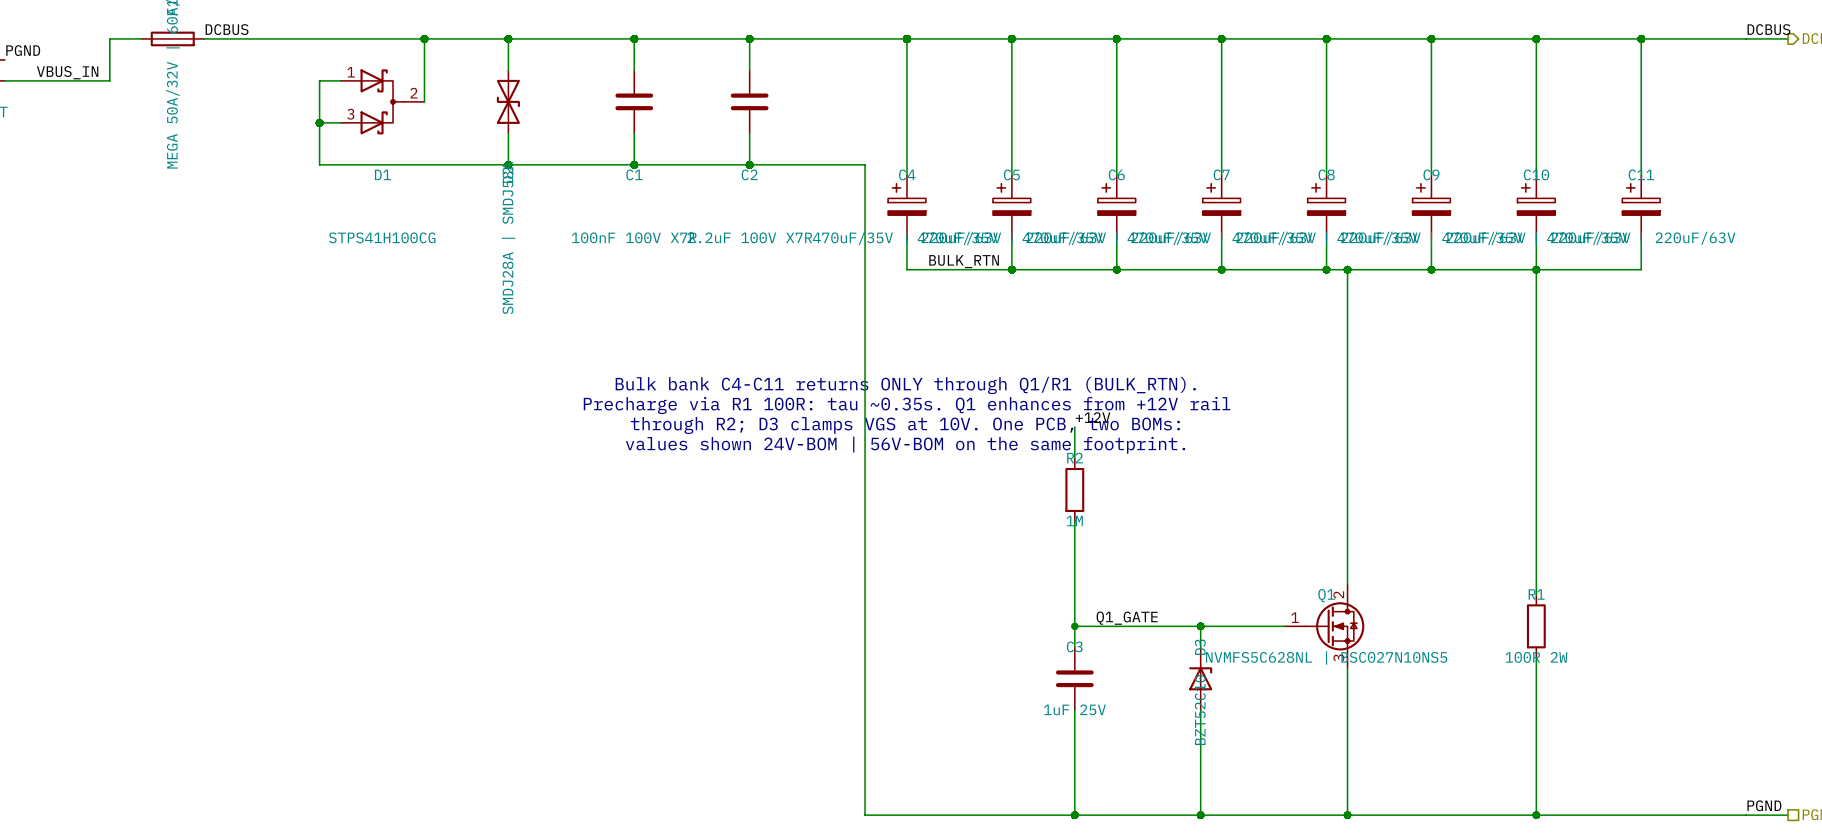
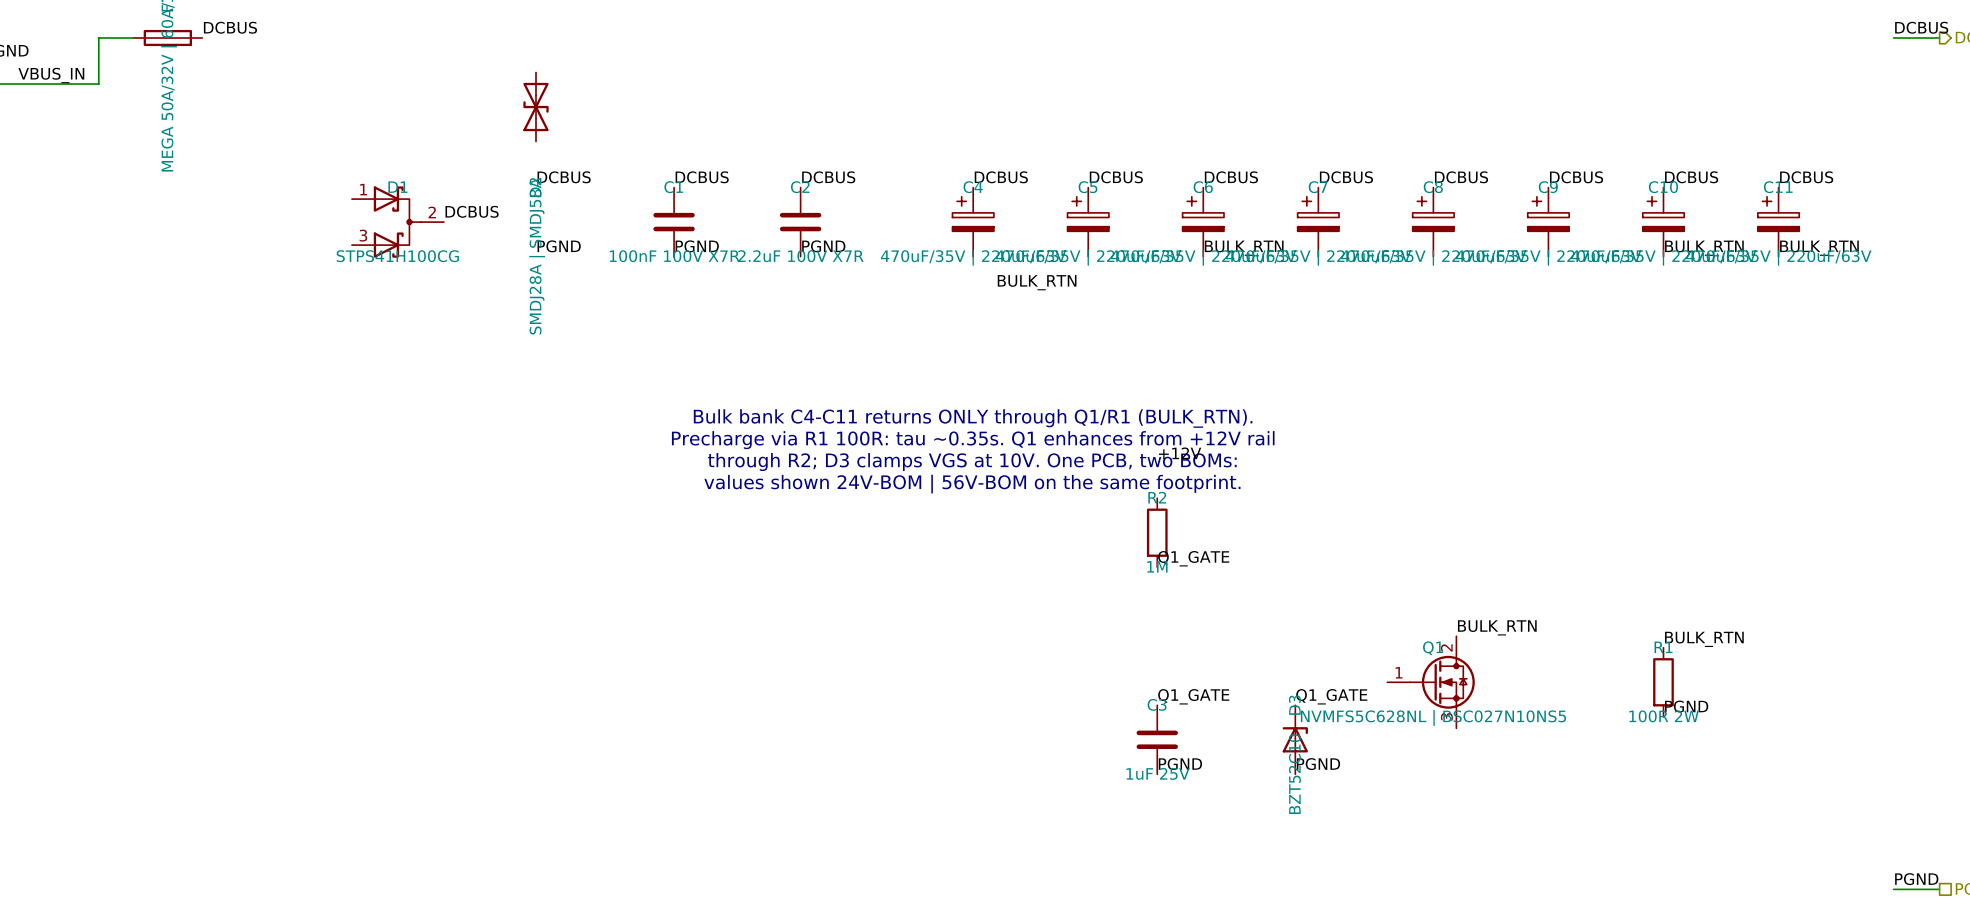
wire: (204, 38) (1746, 38) -> none
wire: (424, 38) (424, 101) -> none
junction: (424, 38) -> none
wire: (508, 38) (508, 70) -> none
junction: (508, 38) -> none
wire: (634, 38) (634, 70) -> none
junction: (634, 38) -> none
wire: (749, 38) (749, 70) -> none
junction: (749, 38) -> none
wire: (906, 38) (906, 175) -> none
junction: (906, 38) -> none
wire: (1011, 38) (1011, 175) -> none
junction: (1011, 38) -> none
wire: (1116, 38) (1116, 175) -> none
junction: (1116, 38) -> none
wire: (1221, 38) (1221, 175) -> none
junction: (1221, 38) -> none
wire: (1326, 38) (1326, 175) -> none
junction: (1326, 38) -> none
wire: (1431, 38) (1431, 175) -> none
junction: (1431, 38) -> none
wire: (1536, 38) (1536, 175) -> none
junction: (1536, 38) -> none
wire: (1641, 38) (1641, 175) -> none
junction: (1641, 38) -> none
wire: (340, 80) (319, 80) (319, 164) (865, 164) (865, 815) (1746, 815) -> none
D1 position: (382, 101) -> (397, 222)
C1 position: (634, 101) -> (674, 222)
C2 position: (749, 101) -> (800, 222)
wire: (319, 122) (340, 122) -> none
junction: (319, 122) -> none
wire: (508, 133) (508, 164) -> none
wire: (634, 133) (634, 164) -> none
wire: (749, 133) (749, 164) -> none
junction: (508, 164) -> none
junction: (634, 164) -> none
junction: (749, 164) -> none
label: none -> DCBUS (564, 177)
label: none -> DCBUS (702, 177)
label: none -> DCBUS (828, 177)
label: none -> DCBUS (1001, 177)
label: none -> DCBUS (1116, 177)
label: none -> DCBUS (1231, 177)
label: none -> DCBUS (1346, 177)
label: none -> DCBUS (1461, 177)
label: none -> DCBUS (1576, 177)
label: none -> DCBUS (1691, 177)
label: none -> DCBUS (1806, 177)
label: none -> DCBUS (472, 211)
label: none -> PGND (559, 246)
label: none -> PGND (697, 246)
label: none -> PGND (823, 246)
label: none -> BULK_RTN (1244, 248)
label: none -> BULK_RTN (1704, 248)
label: none -> BULK_RTN (1819, 248)
wire: (906, 238) (906, 269) (1641, 269) (1641, 238) -> none
wire: (1011, 238) (1011, 269) -> none
wire: (1116, 238) (1116, 269) -> none
wire: (1221, 238) (1221, 269) -> none
wire: (1326, 238) (1326, 269) -> none
wire: (1431, 238) (1431, 269) -> none
wire: (1536, 238) (1536, 594) -> none
junction: (1011, 269) -> none
junction: (1116, 269) -> none
junction: (1221, 269) -> none
junction: (1326, 269) -> none
wire: (1347, 269) (1347, 584) -> none
junction: (1347, 269) -> none
junction: (1431, 269) -> none
junction: (1536, 269) -> none
wire: (1074, 427) (1074, 458) -> none
label: none -> Q1_GATE (1193, 558)
wire: (1074, 521) (1074, 647) -> none
label: none -> BULK_RTN (1497, 627)
label: none -> BULK_RTN (1704, 639)
label position: Q1_GATE (1127, 618) -> Q1_GATE (1193, 696)
wire: (1074, 626) (1284, 626) -> none
junction: (1074, 626) -> none
wire: (1200, 626) (1200, 647) -> none
junction: (1200, 626) -> none
label: none -> Q1_GATE (1331, 696)
label: none -> PGND (1686, 706)
wire: (1536, 657) (1536, 815) -> none
wire: (1347, 668) (1347, 815) -> none
label: none -> PGND (1180, 764)
label: none -> PGND (1318, 764)
wire: (1074, 710) (1074, 815) -> none
wire: (1200, 710) (1200, 815) -> none
junction: (1074, 815) -> none
junction: (1200, 815) -> none
junction: (1347, 815) -> none
junction: (1536, 815) -> none

